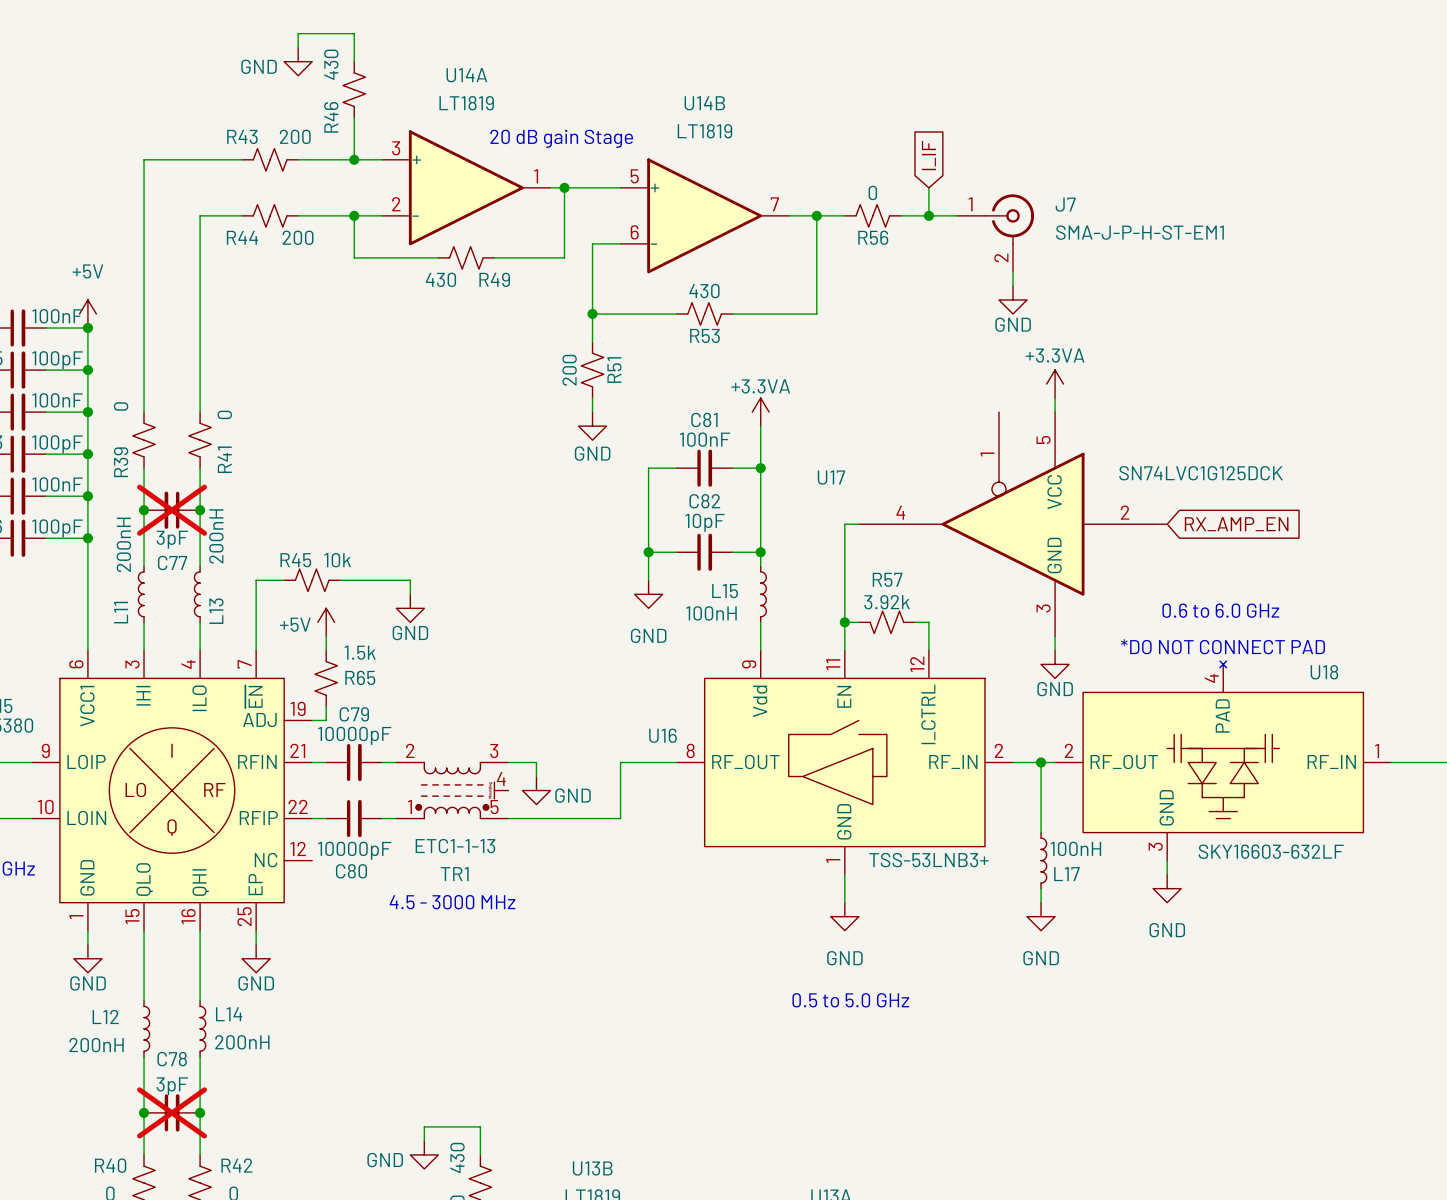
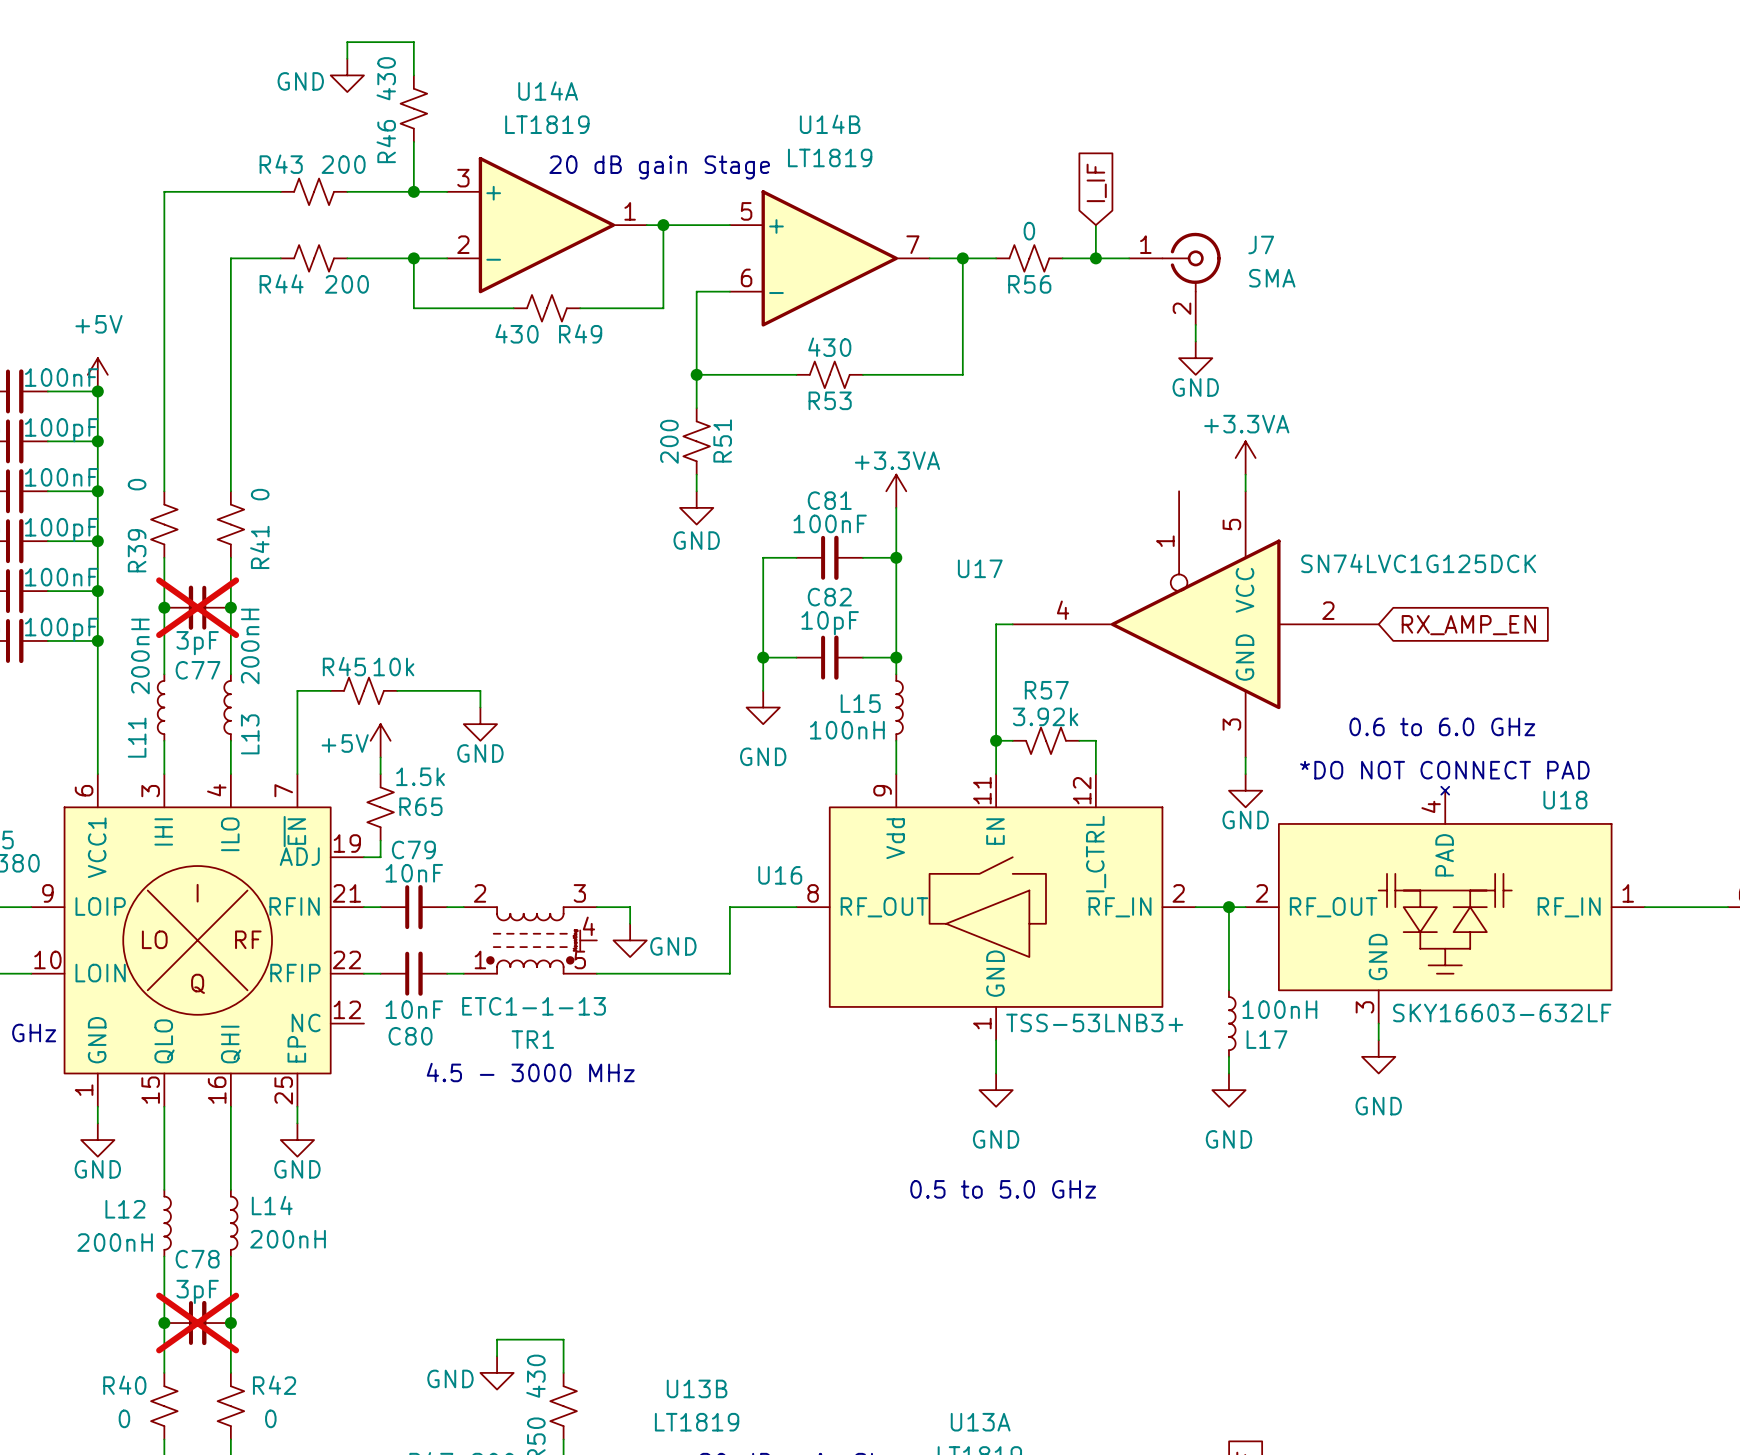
J7 value: SMA-J-P-H-ST-EM1 (1139, 232) -> SMA (1272, 278)
C79 value: 10000pF (354, 735) -> 10nF (414, 873)
C80 value: 10000pF (354, 850) -> 10nF (414, 1009)

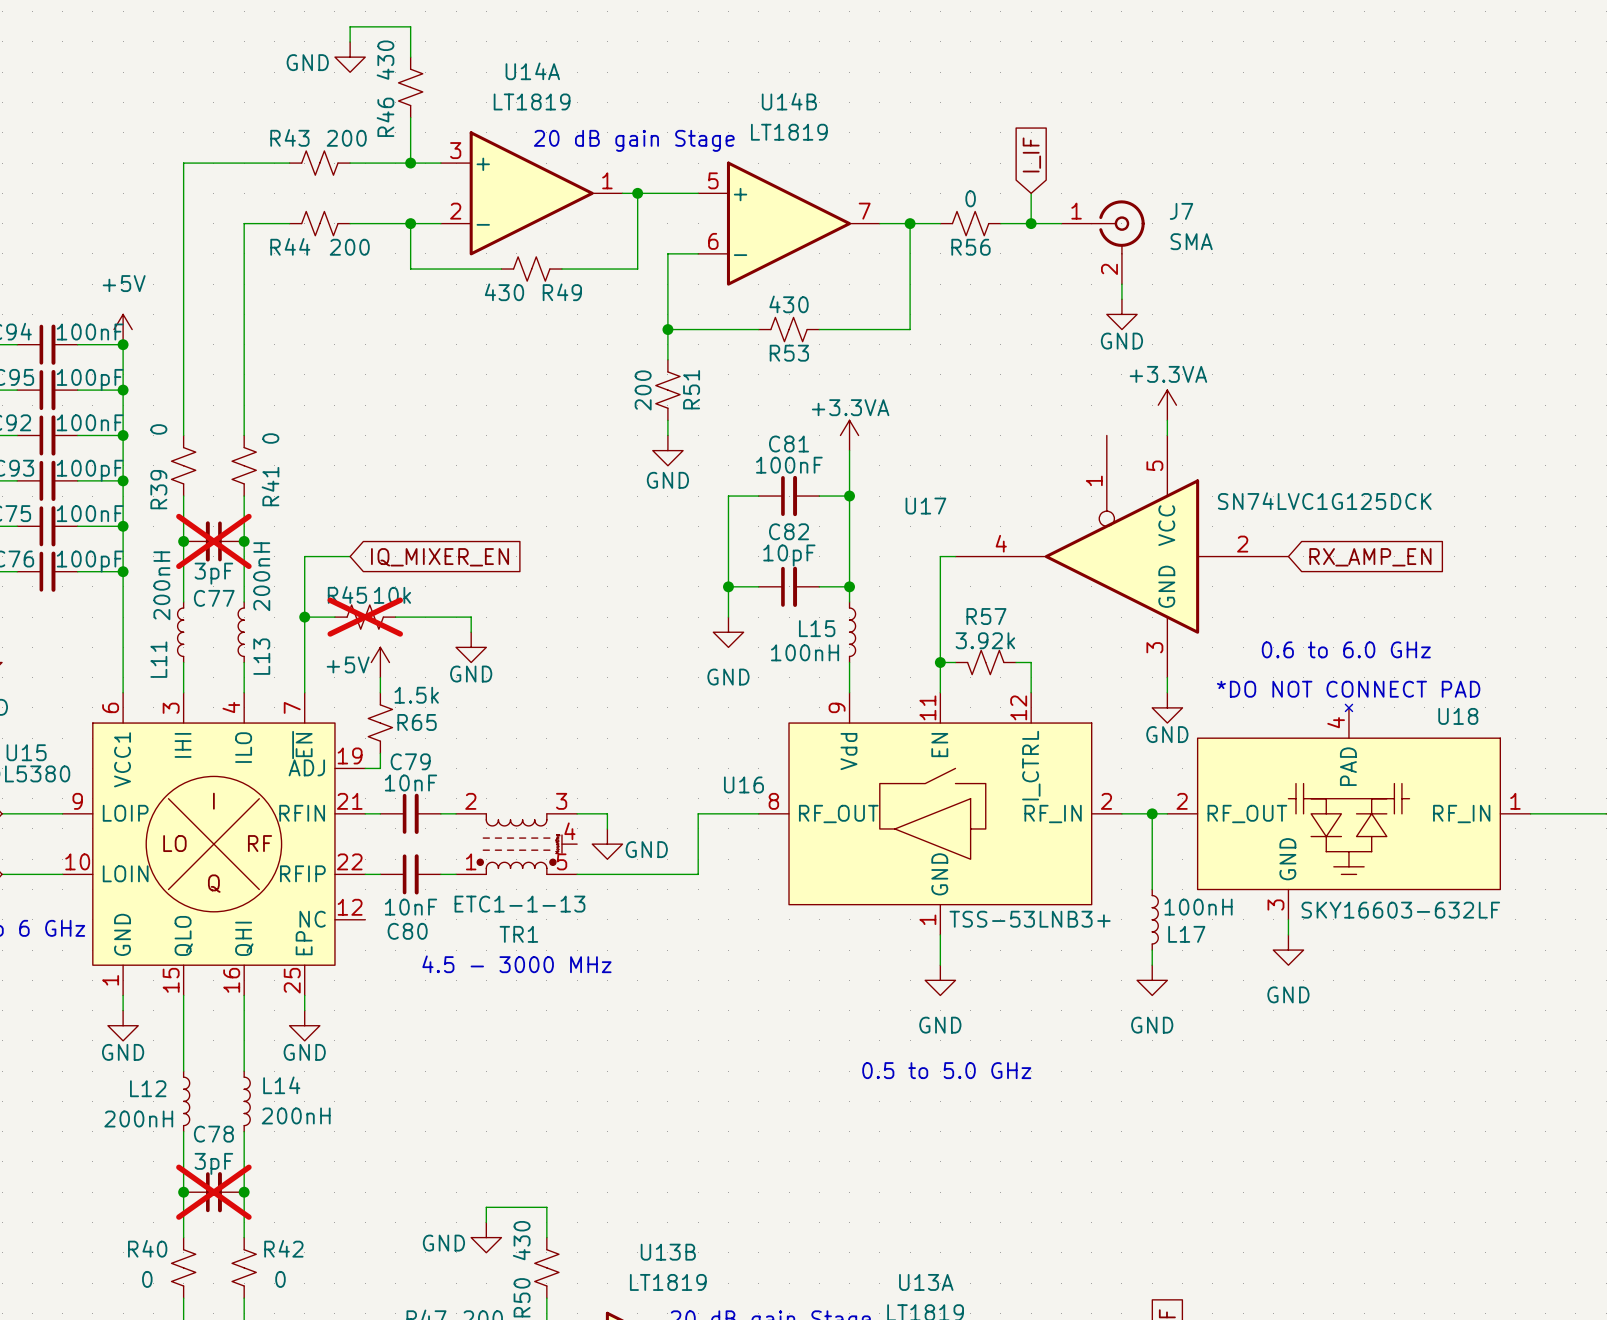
wire: none -> (350, 556) (304, 556) (304, 617)
global label: none -> IQ_MIXER_EN (440, 557)
junction: none -> (304, 617)
R45 do-not-place cross: none -> (365, 617)

